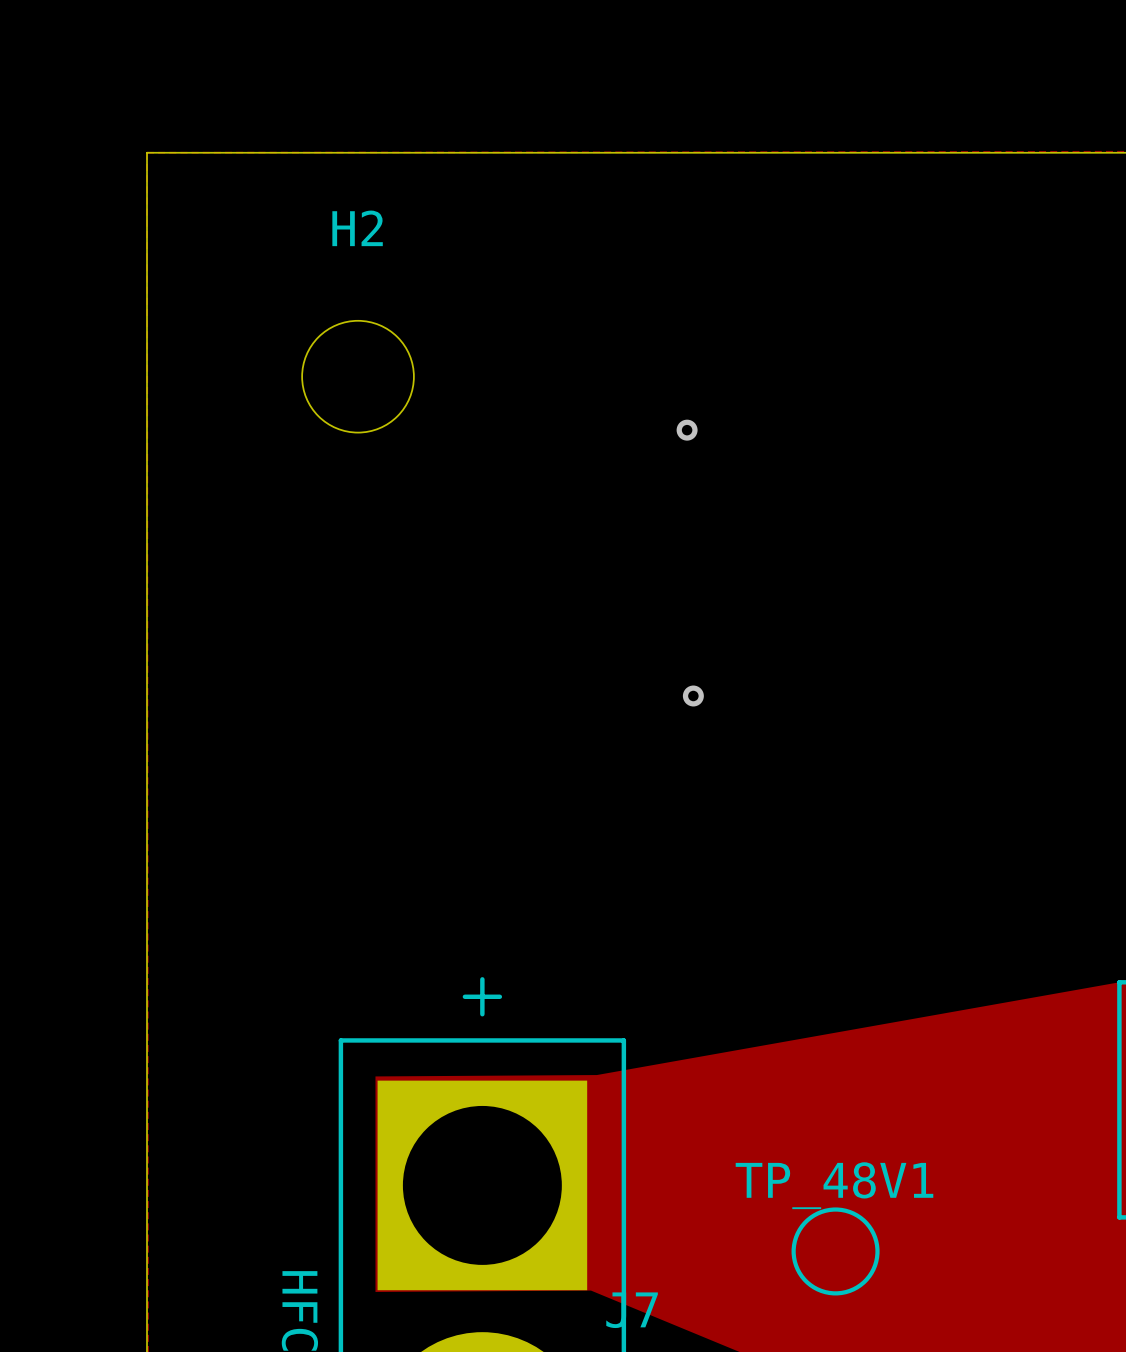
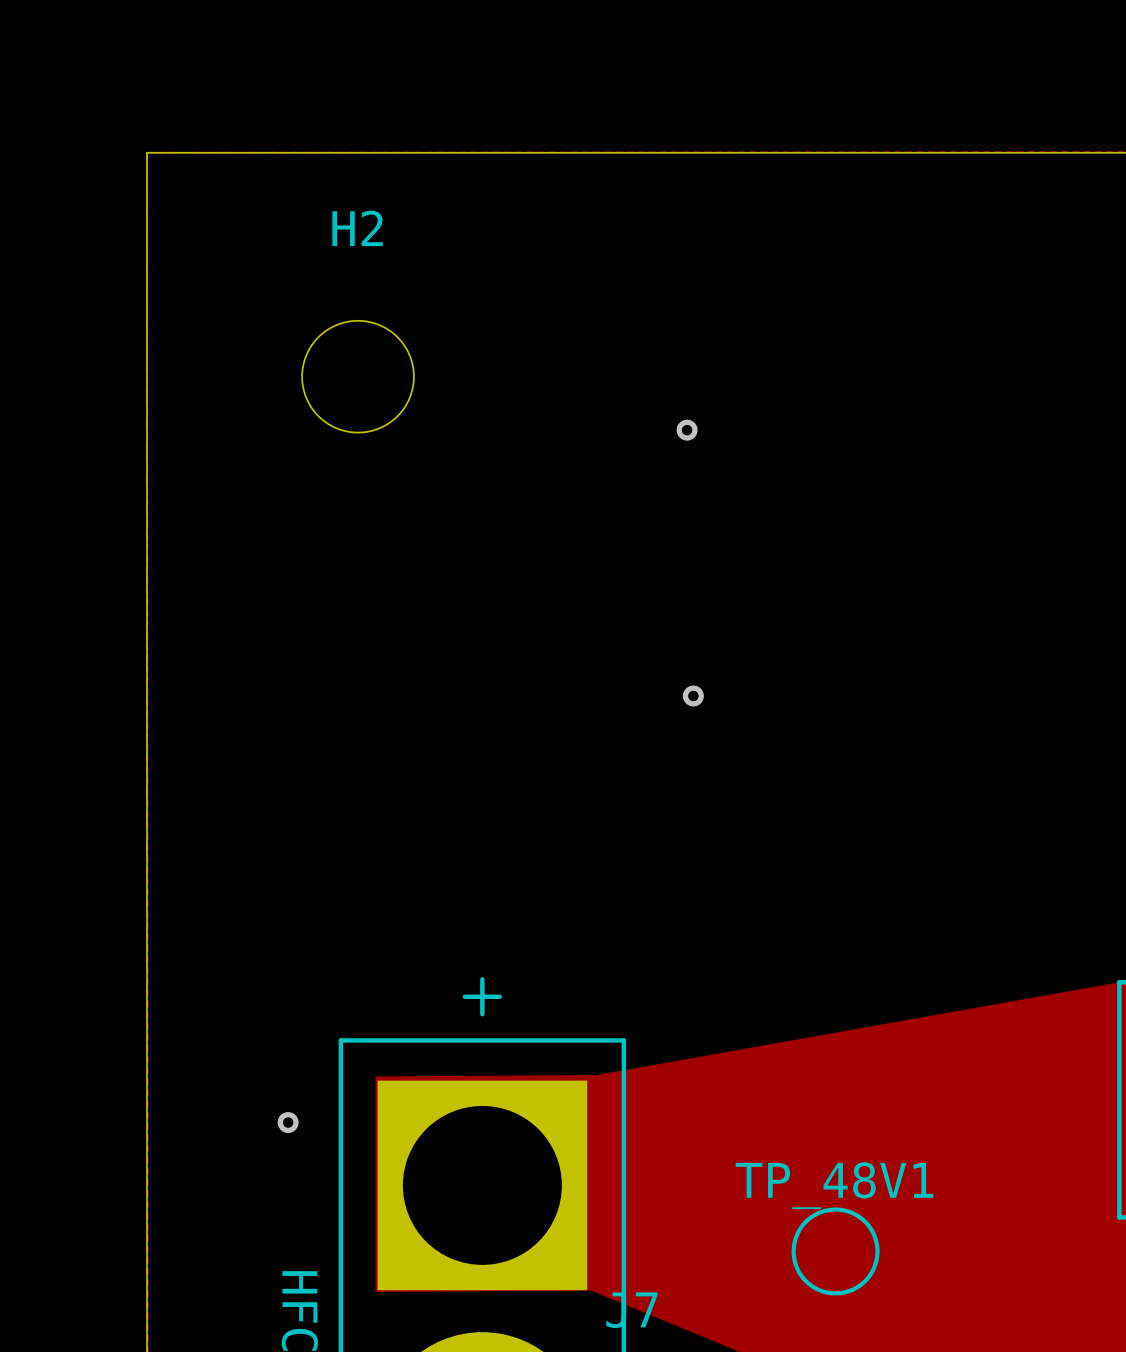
via: none -> (288, 1122)

